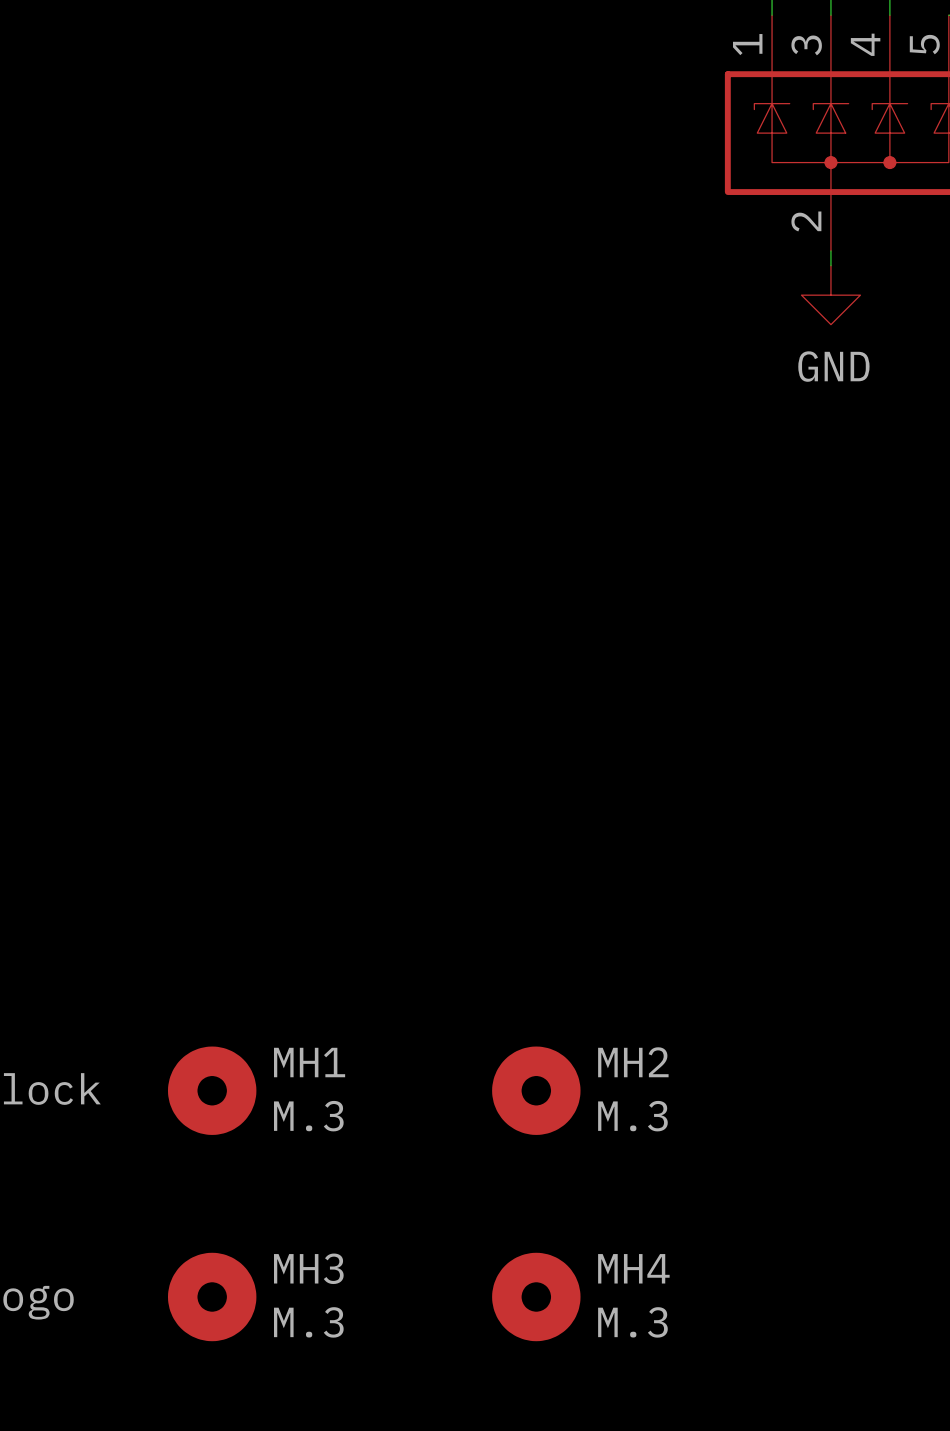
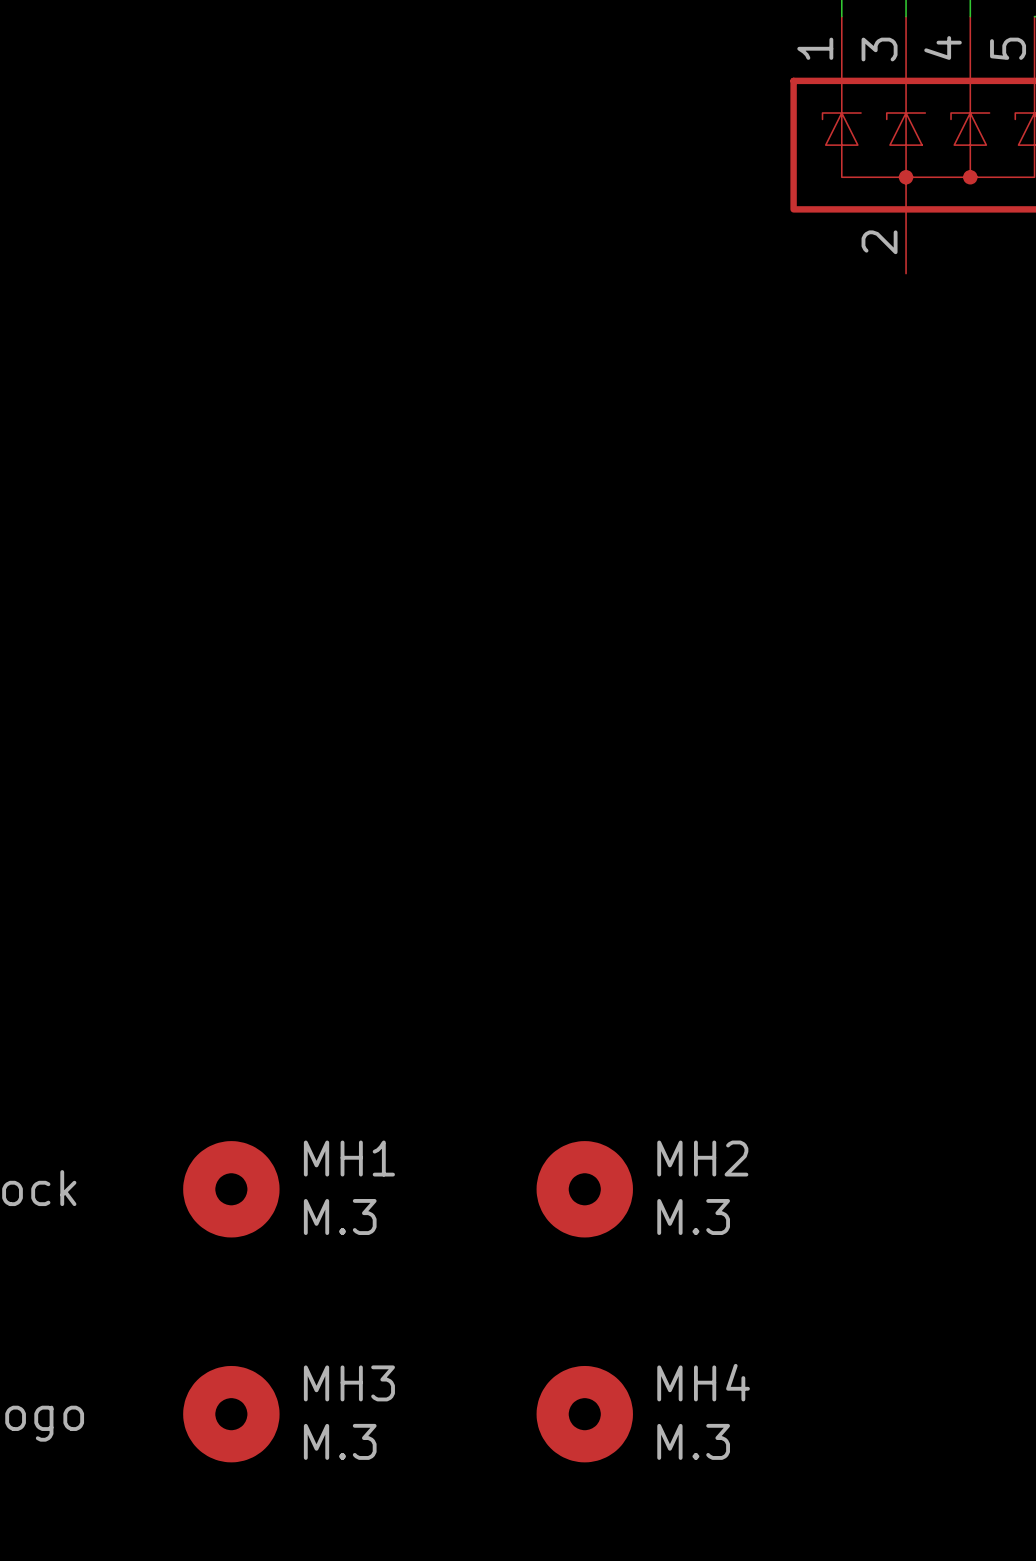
wire: (830, 250) (830, 265) -> none
power symbol: GND (830, 295) -> none

